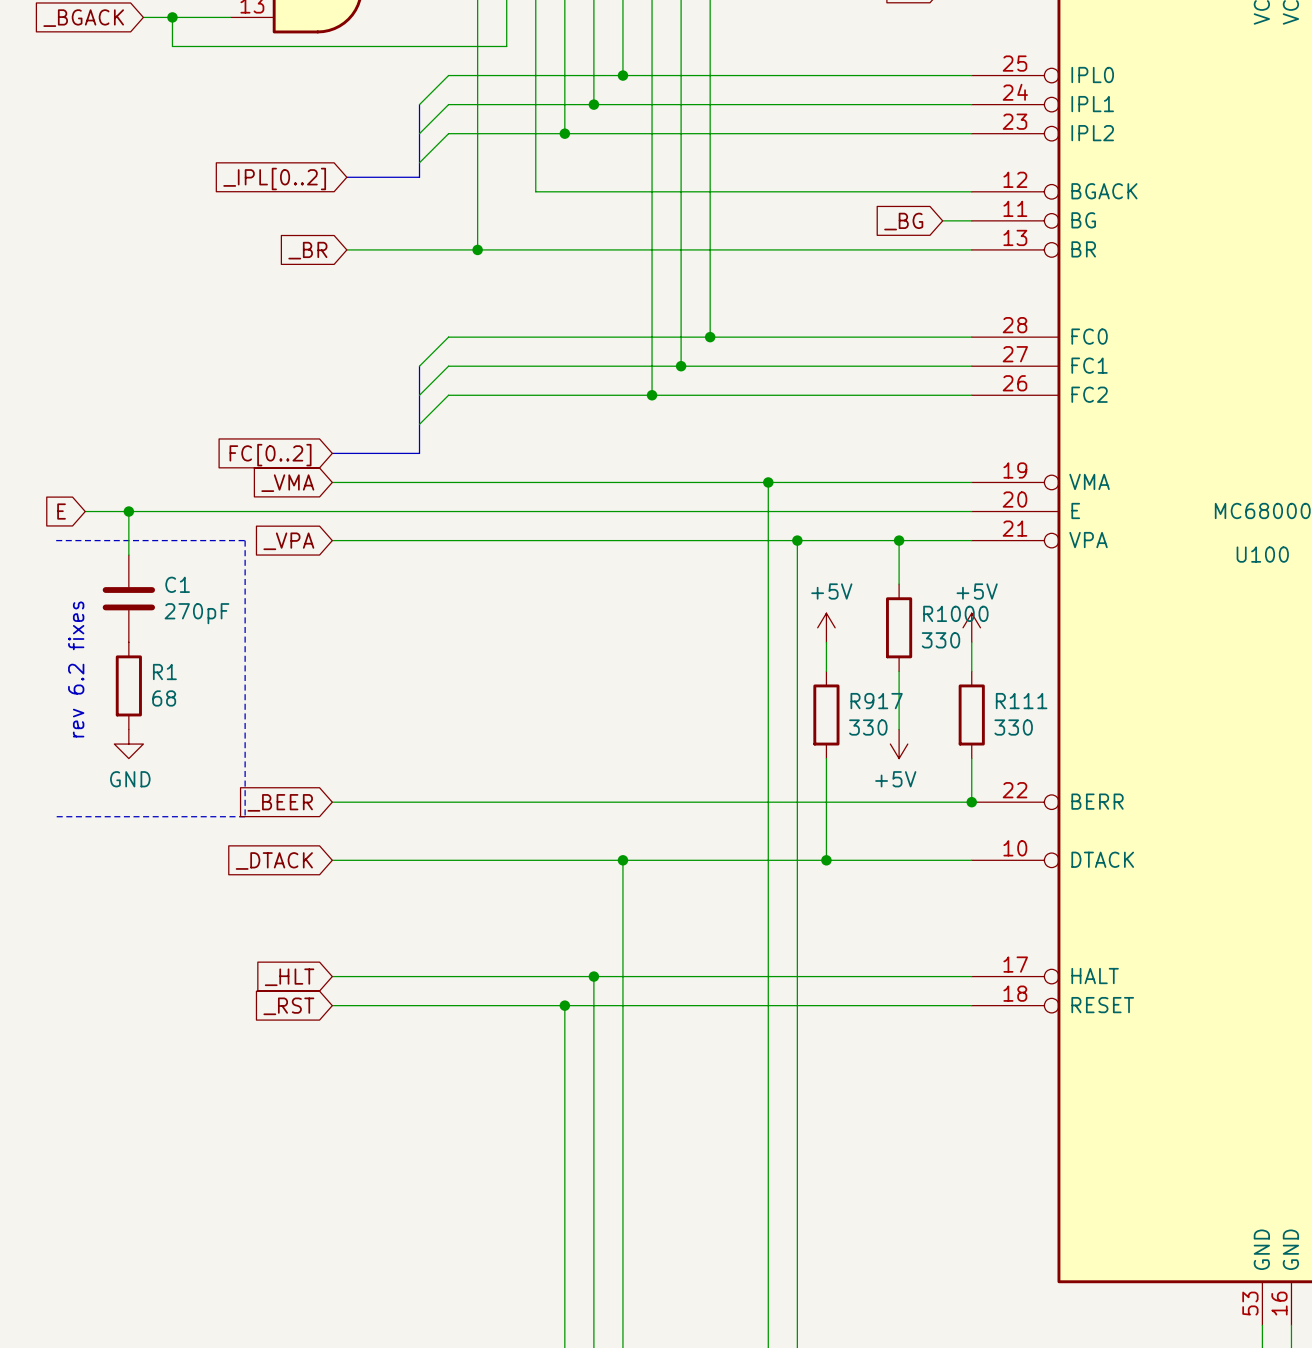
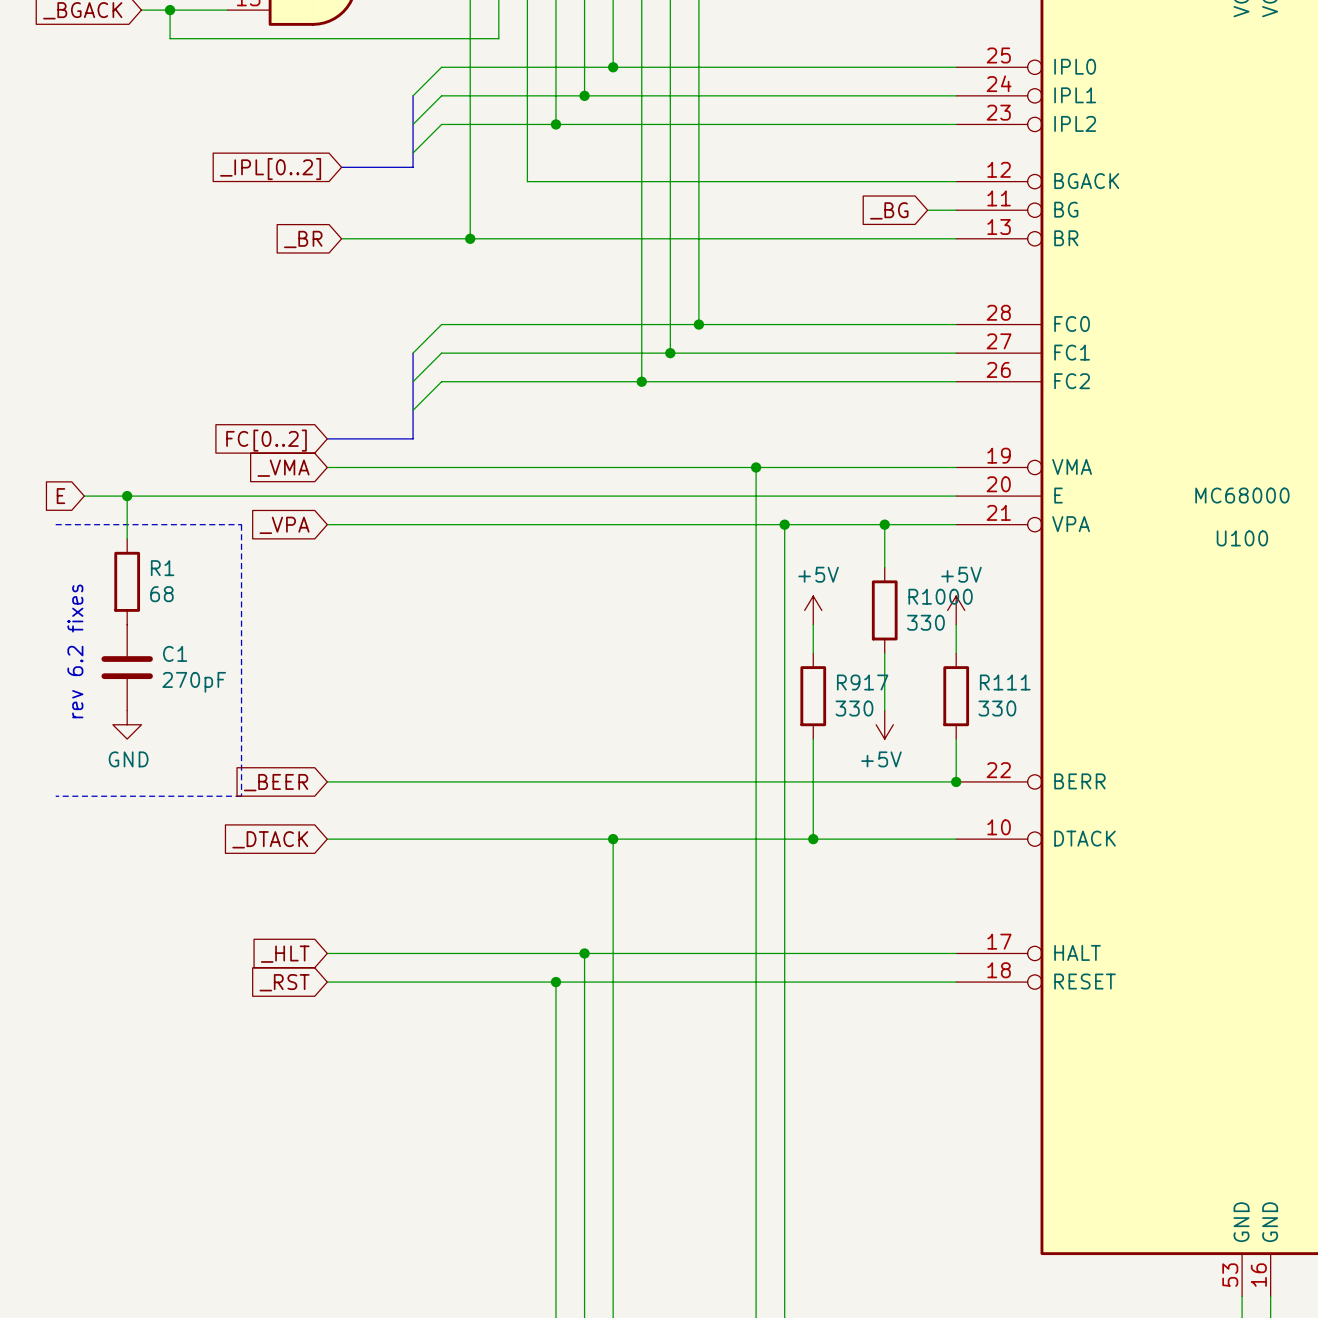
C1 position: (128, 598) -> (127, 667)
R1 position: (128, 685) -> (127, 581)

